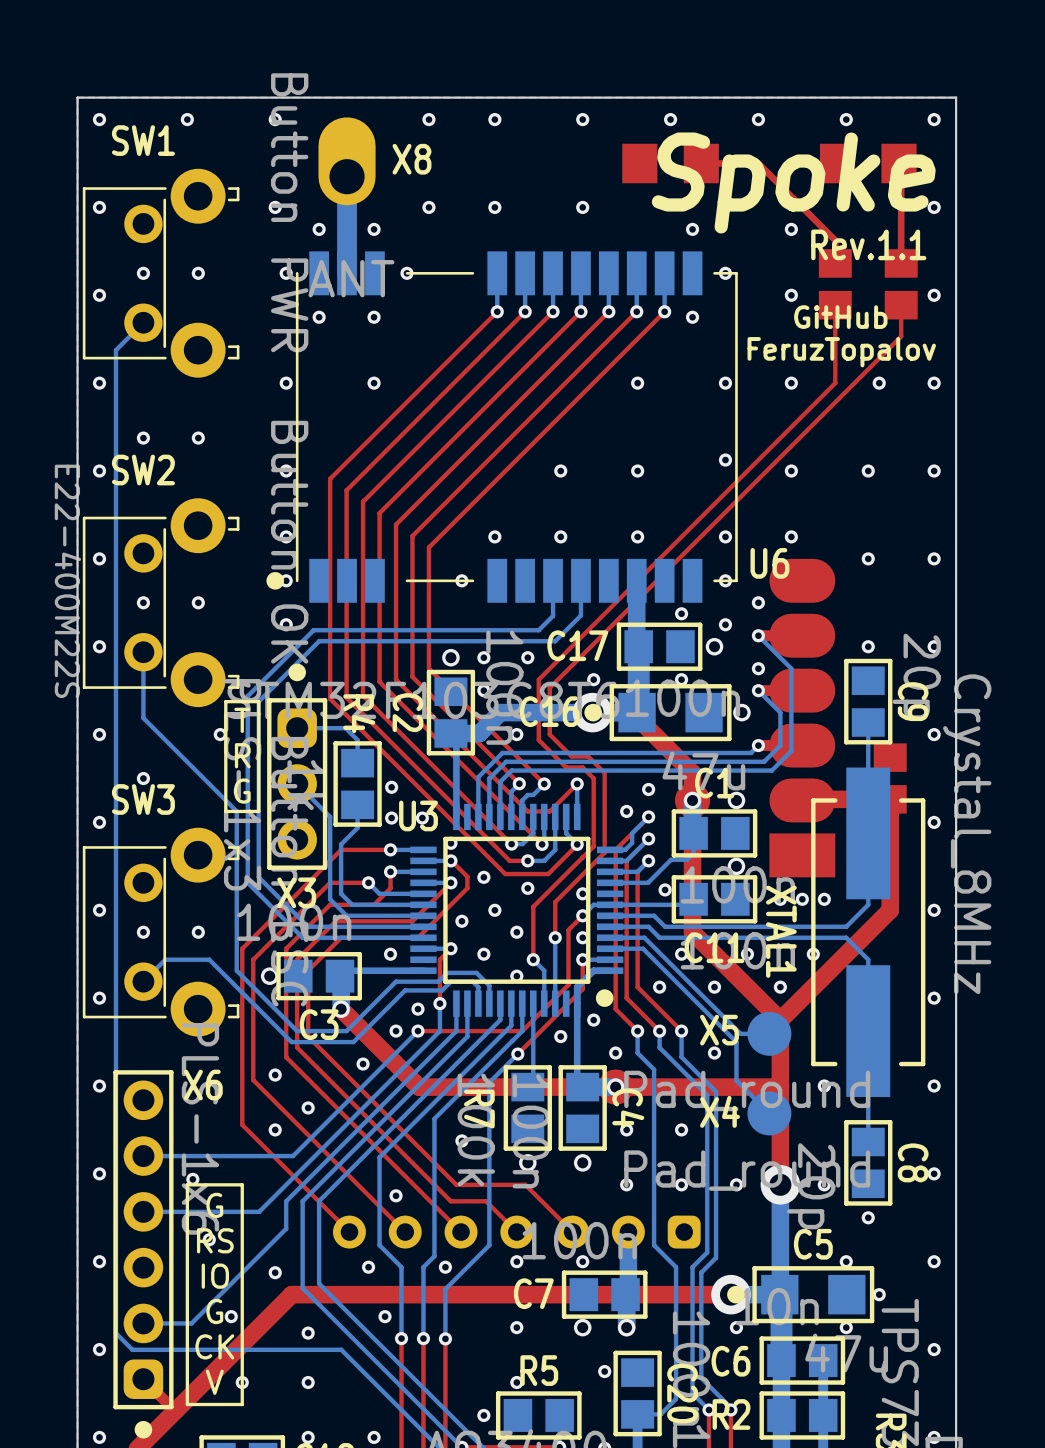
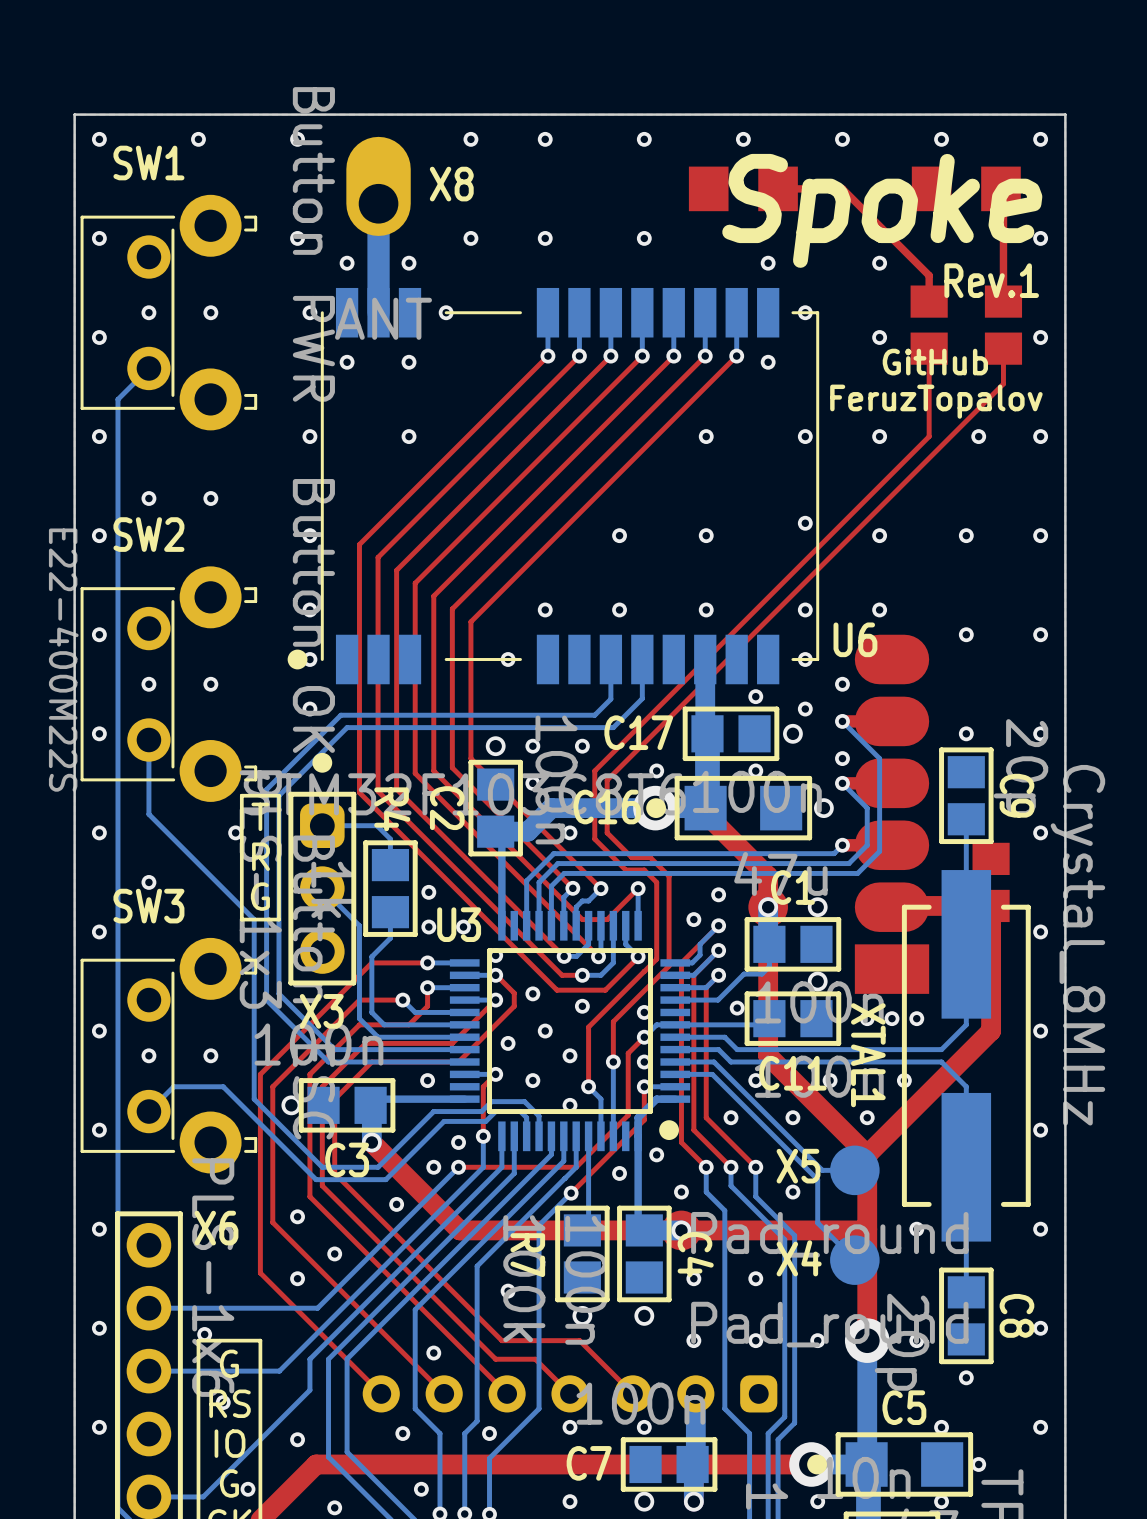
text: Rev.1.1 (868, 244) -> Rev.1 (991, 280)

